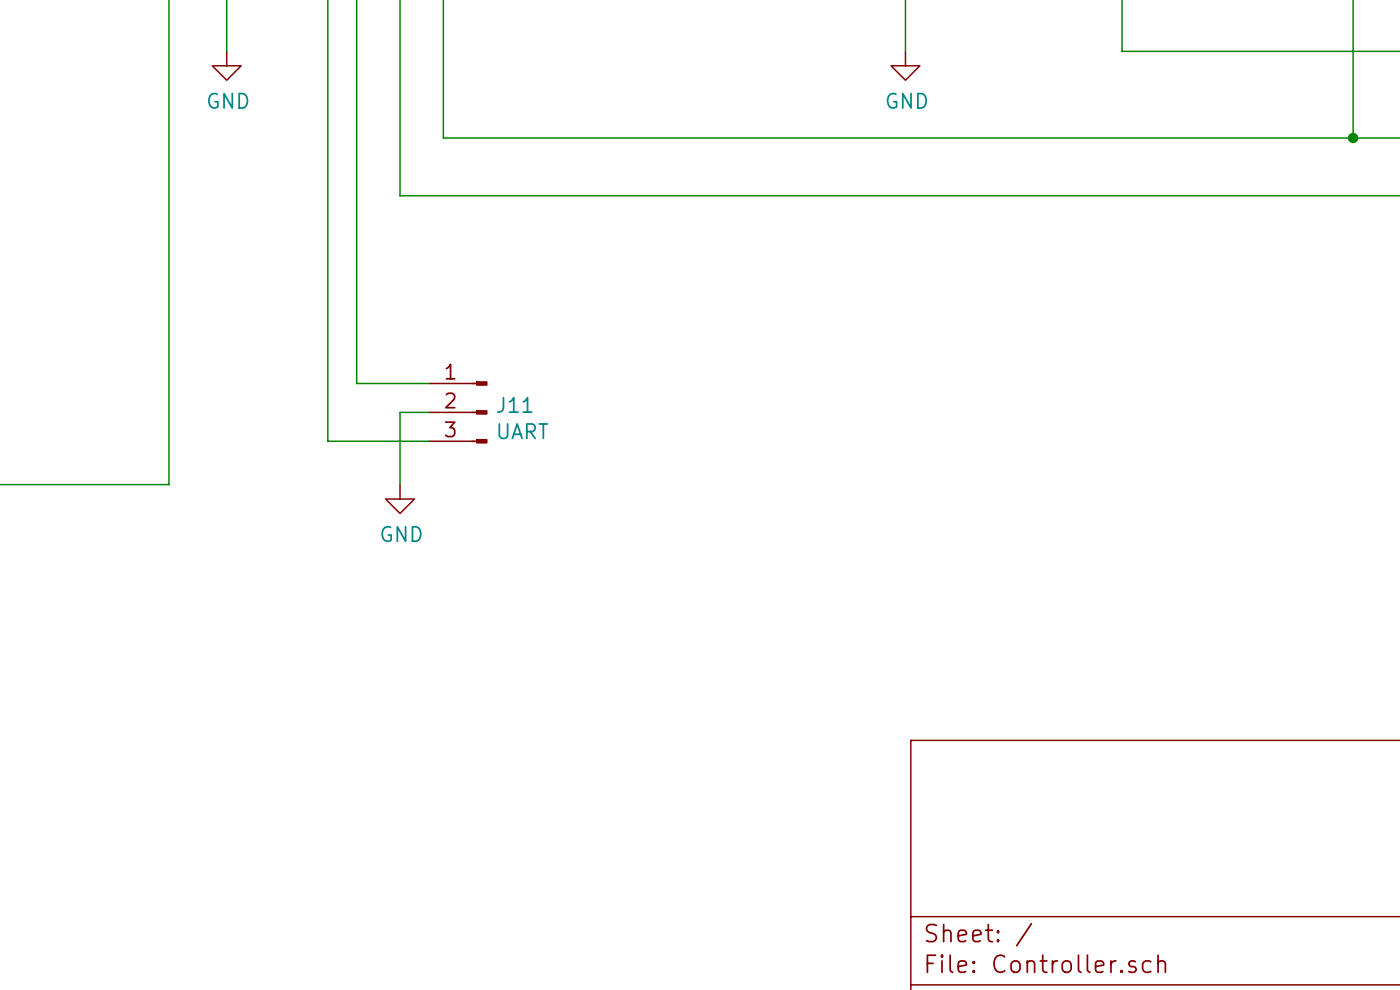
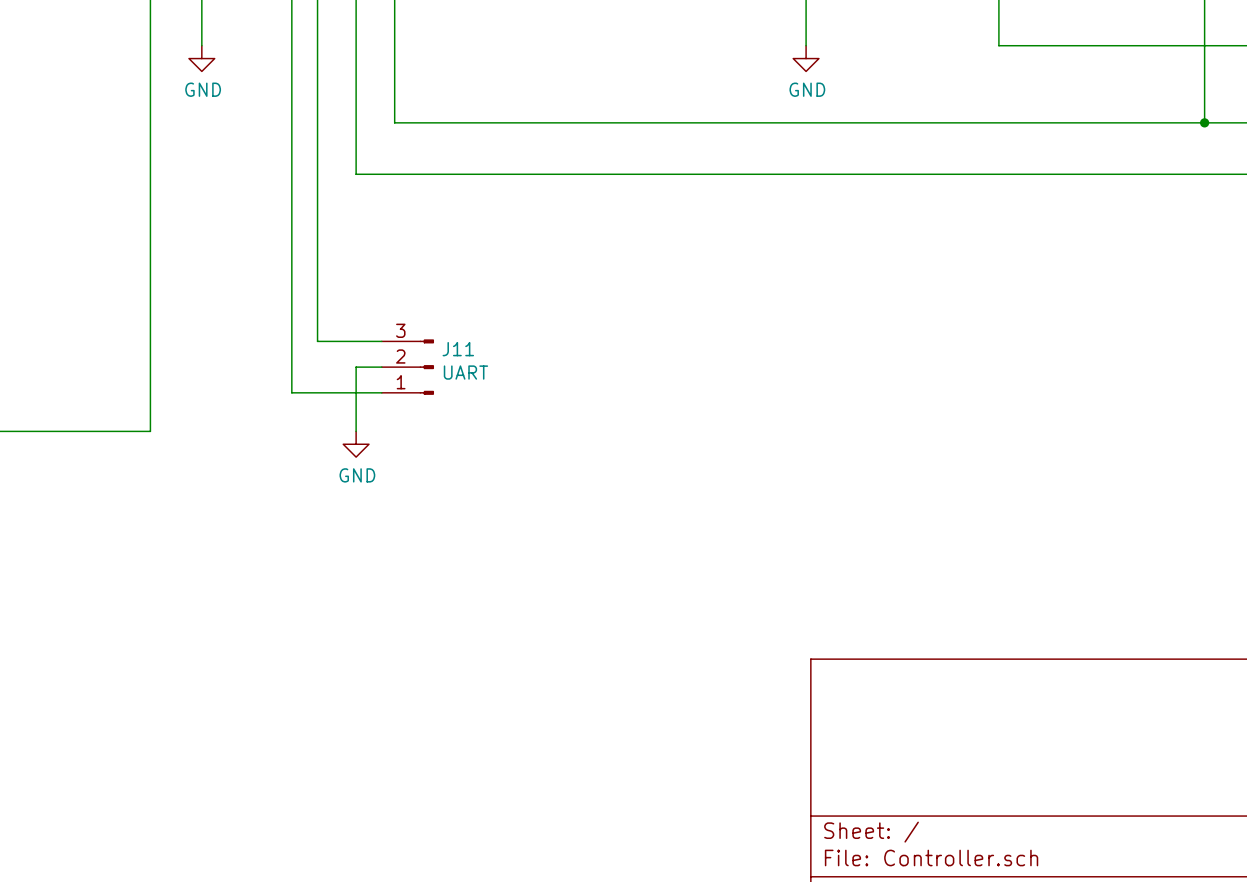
J11 flip: as is (479, 412) -> up-down (426, 367)

